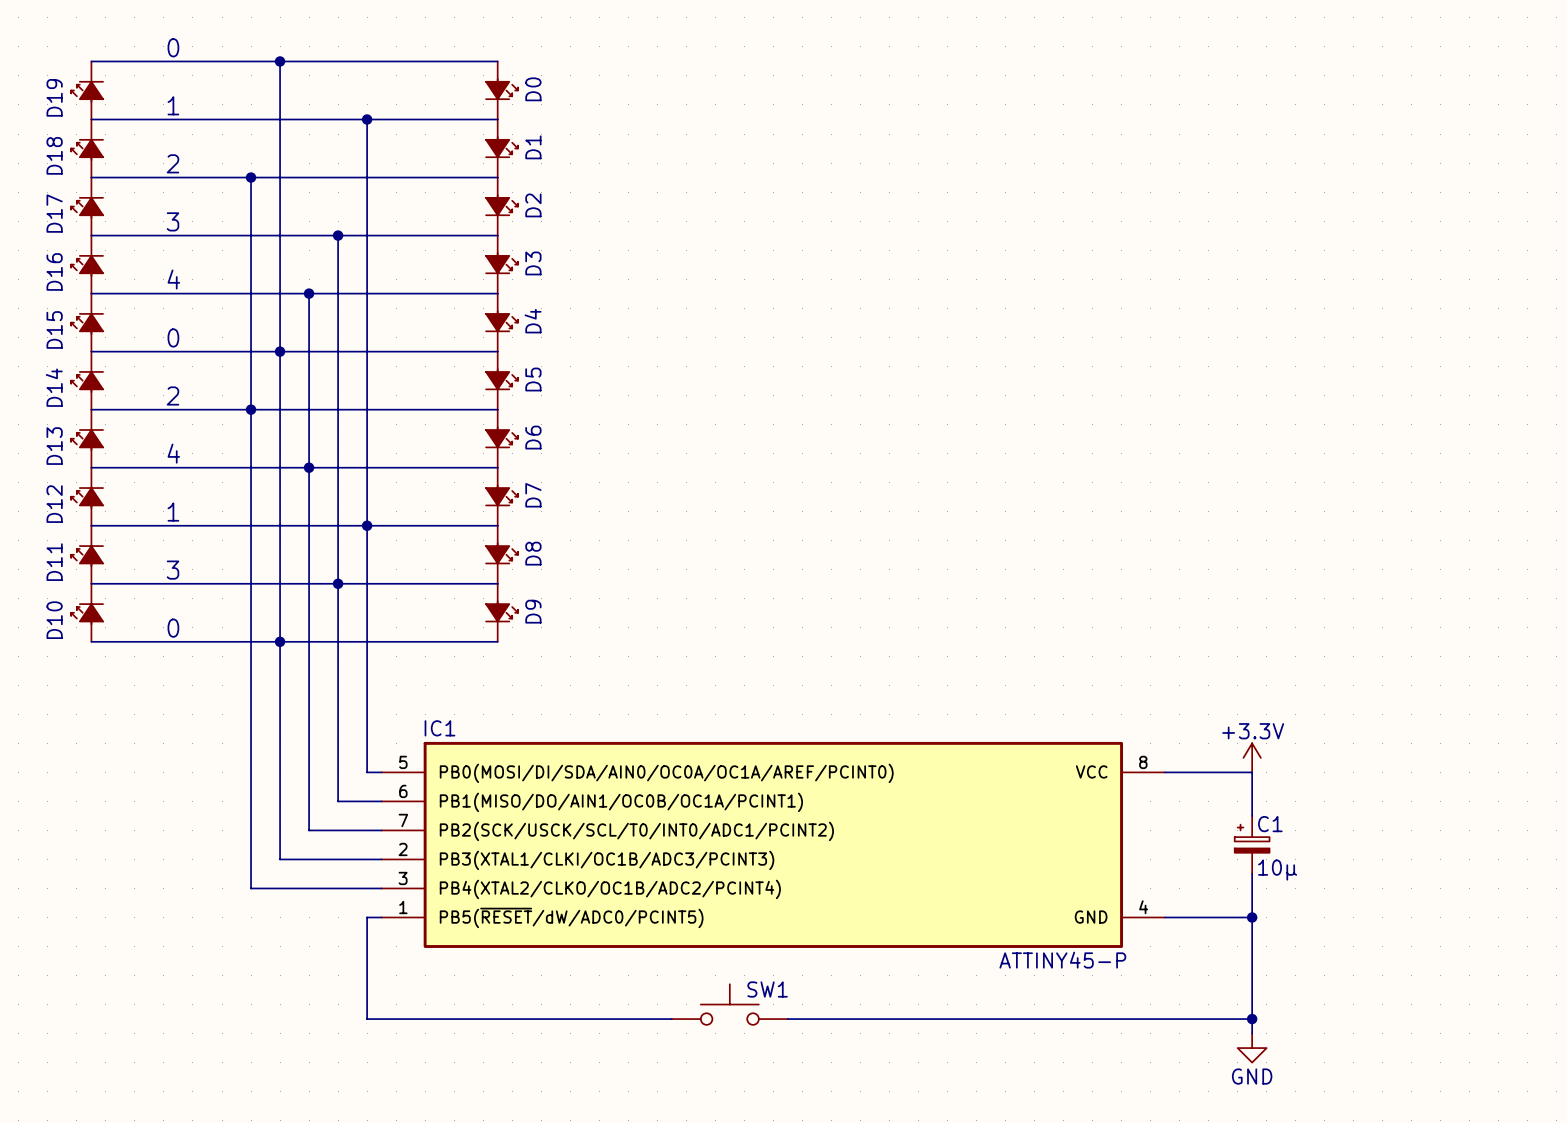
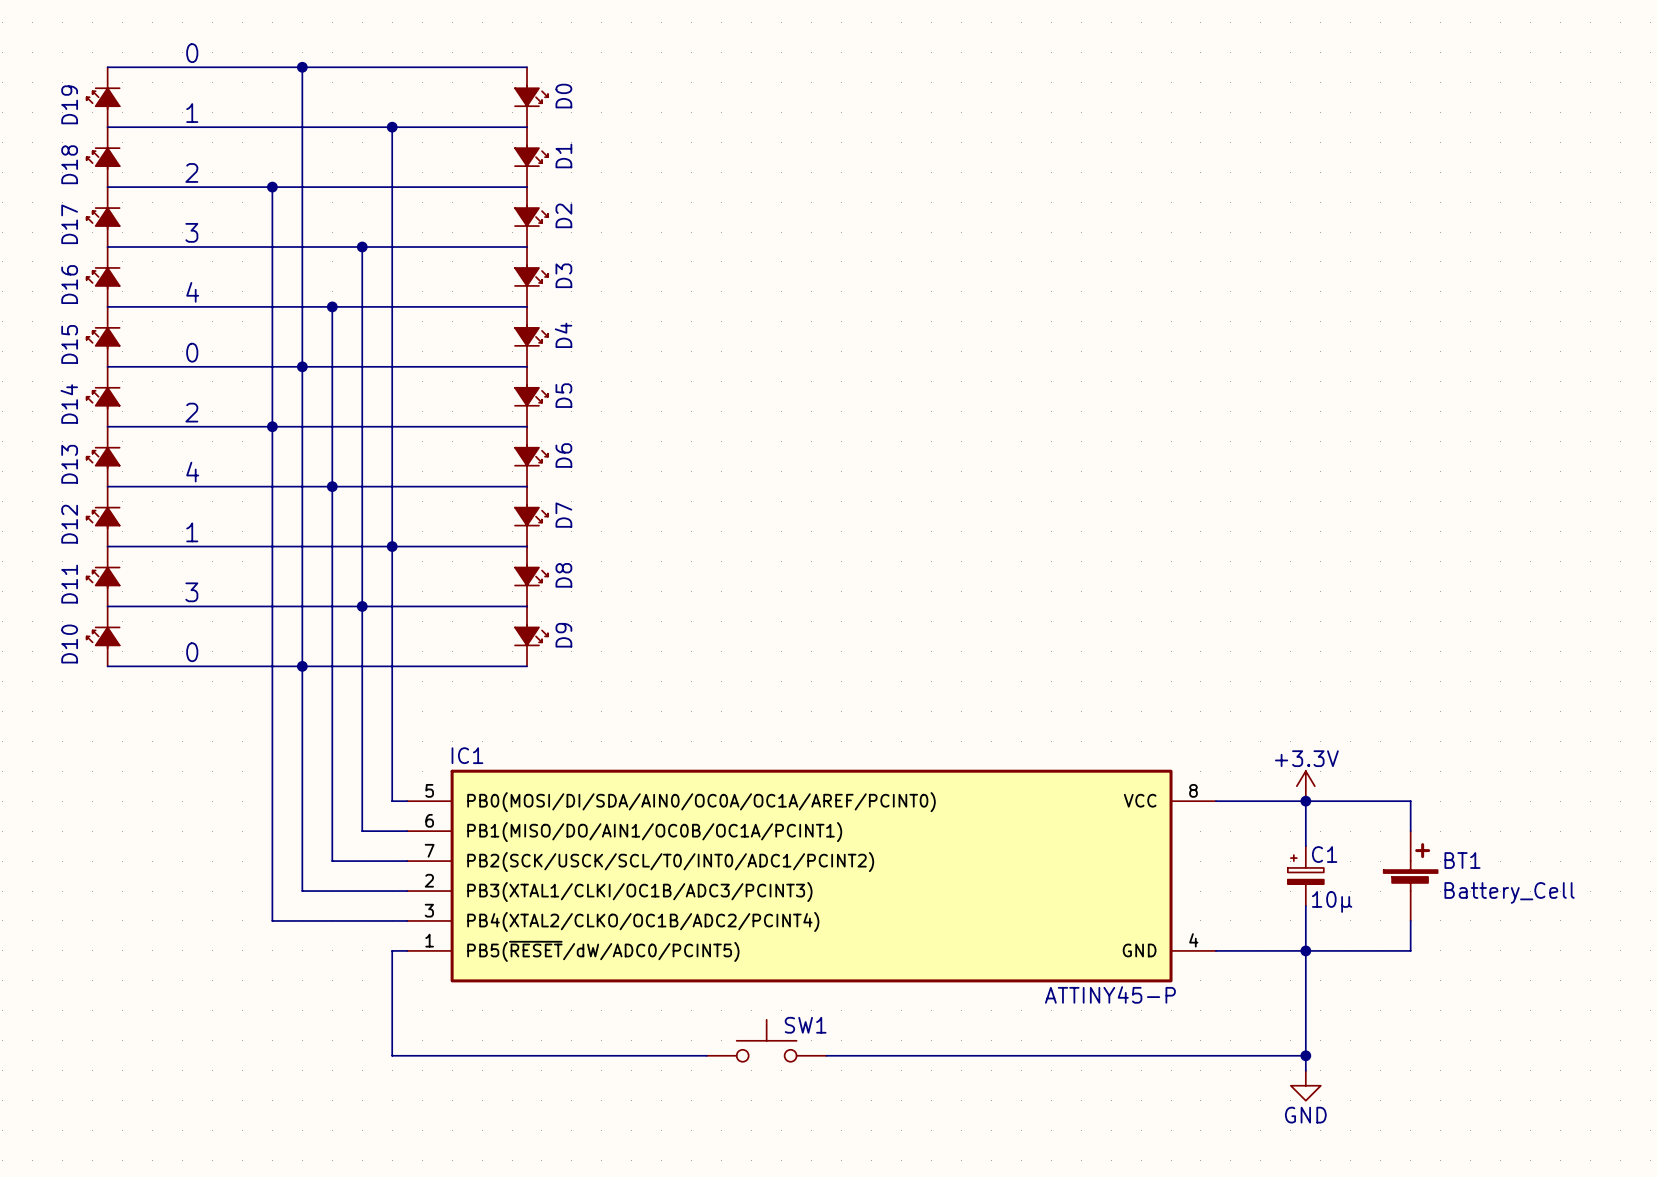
wire: none -> (1305, 801) (1410, 801) (1410, 831)
junction: none -> (1305, 801)
BT1: none -> Battery_Cell (1410, 876)
wire: none -> (1410, 920) (1410, 950) (1305, 950)

